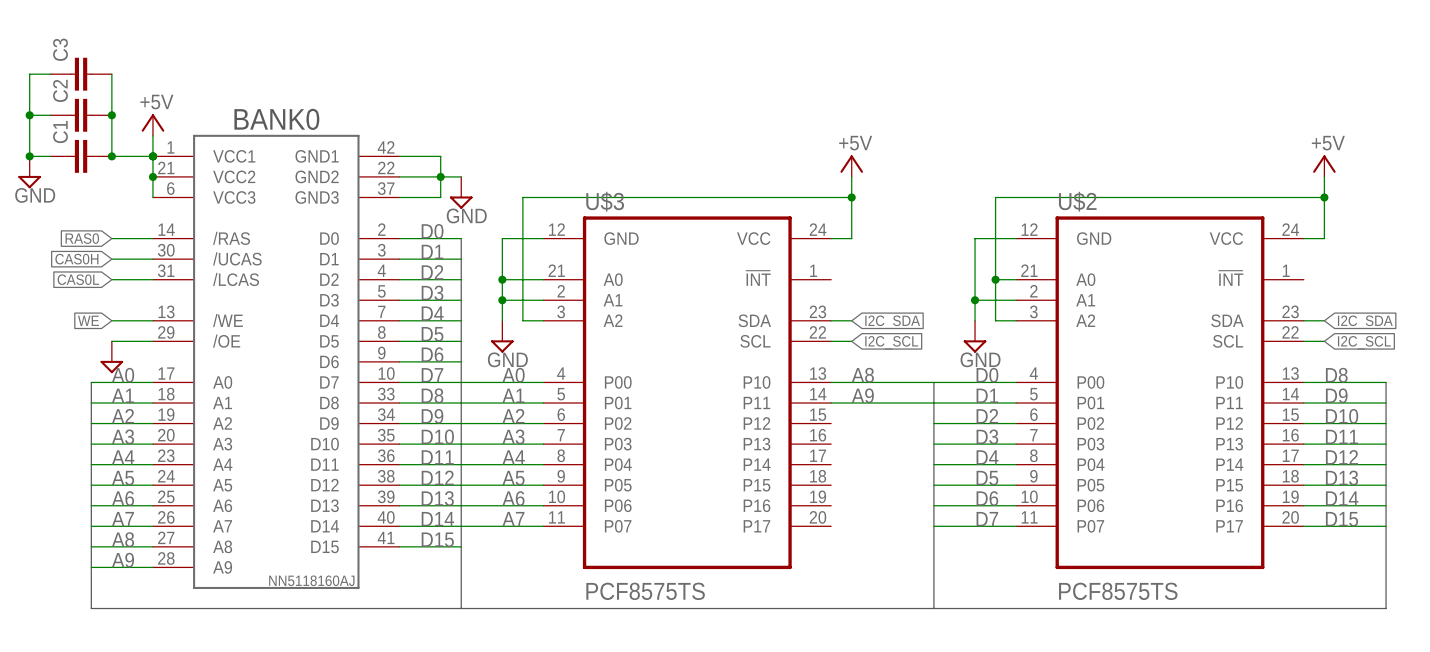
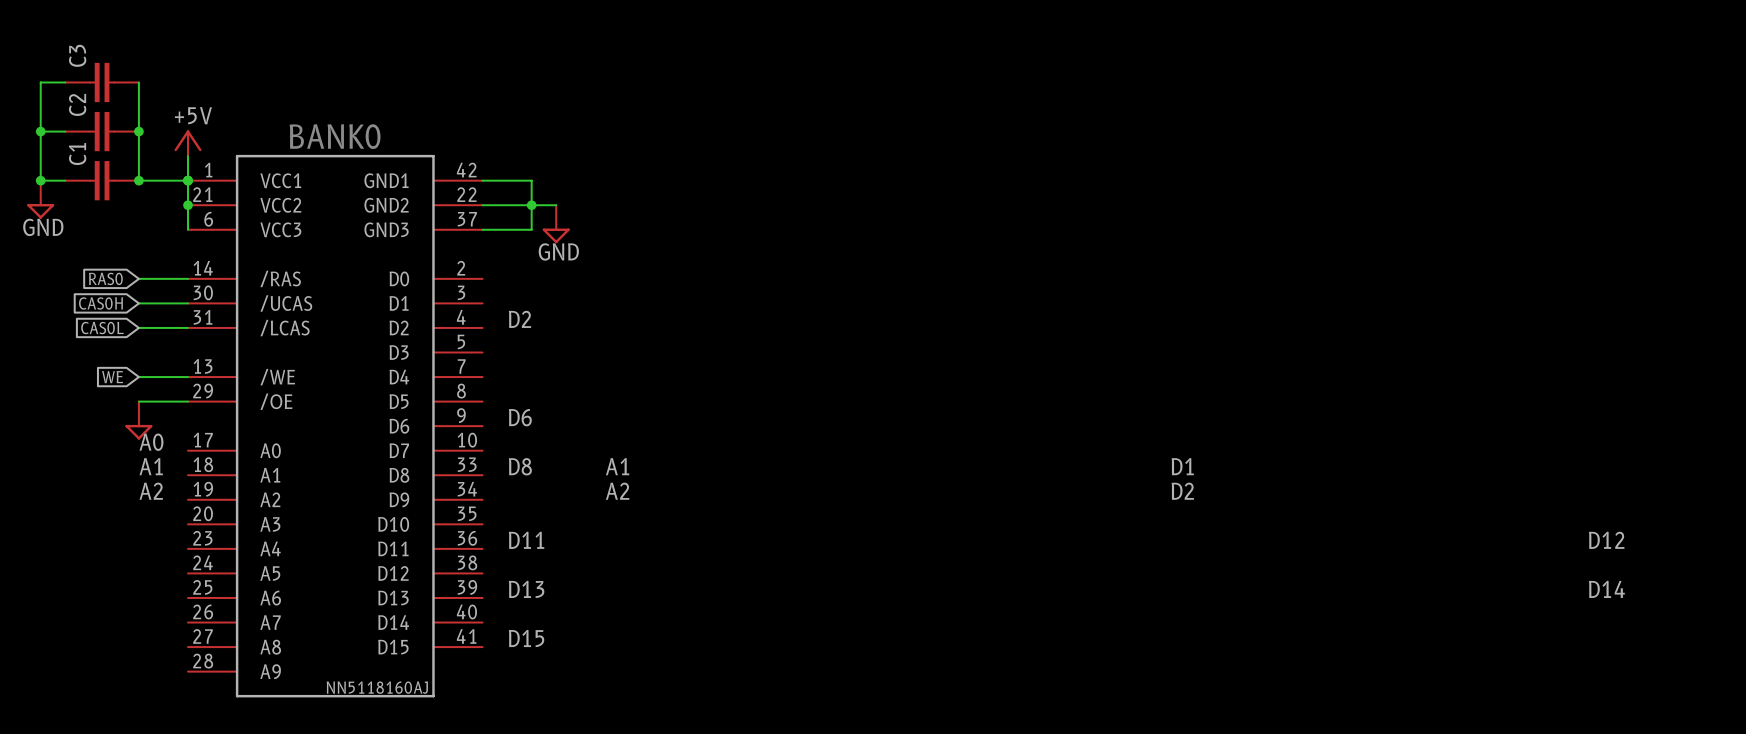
power symbol: +5V (851, 166) -> none
power symbol: +5V (1324, 166) -> none
wire: (851, 176) (851, 238) (831, 238) -> none
wire: (1324, 176) (1324, 238) (1303, 238) -> none
wire: (851, 197) (522, 197) (522, 320) (543, 320) -> none
junction: (851, 197) -> none
wire: (1324, 197) (995, 197) (995, 320) (1016, 320) -> none
junction: (1324, 197) -> none
label: D0 (432, 231) -> none
wire: (399, 238) (461, 238) -> none
bus: (461, 238) (461, 608) -> none
wire: (543, 238) (502, 238) (502, 320) -> none
wire: (1016, 238) (975, 238) (975, 320) -> none
label: D1 (432, 251) -> none
wire: (399, 259) (461, 259) -> none
wire: (399, 279) (461, 279) -> none
wire: (502, 279) (543, 279) -> none
junction: (502, 279) -> none
wire: (995, 279) (1016, 279) -> none
junction: (995, 279) -> none
label: D3 (432, 293) -> none
wire: (399, 300) (461, 300) -> none
wire: (502, 300) (543, 300) -> none
junction: (502, 300) -> none
wire: (975, 300) (1016, 300) -> none
junction: (975, 300) -> none
label: D4 (432, 313) -> none
wire: (399, 320) (461, 320) -> none
wire: (831, 320) (851, 320) -> none
wire: (1303, 320) (1324, 320) -> none
global label: I2C_SDA (892, 322) -> none
global label: I2C_SDA (1365, 322) -> none
label: D5 (432, 334) -> none
power symbol: GND (502, 336) -> none
power symbol: GND (975, 336) -> none
wire: (399, 341) (461, 341) -> none
wire: (831, 341) (851, 341) -> none
wire: (1303, 341) (1324, 341) -> none
global label: I2C_SCL (891, 342) -> none
global label: I2C_SCL (1364, 342) -> none
wire: (399, 361) (461, 361) -> none
label: D7 (432, 375) -> none
label: A0 (513, 375) -> none
label: A8 (862, 375) -> none
label: D0 (987, 375) -> none
label: D8 (1336, 375) -> none
bus: (91, 382) (91, 608) (1386, 608) (1386, 382) -> none
wire: (91, 382) (152, 382) -> none
wire: (399, 382) (543, 382) -> none
wire: (831, 382) (1016, 382) -> none
bus: (933, 382) (933, 608) -> none
wire: (1303, 382) (1386, 382) -> none
U$3: PCF8575TS (687, 392) -> none
U$2: PCF8575TS (1159, 392) -> none
label: A9 (862, 395) -> none
label: D9 (1336, 395) -> none
wire: (91, 403) (152, 403) -> none
wire: (399, 403) (543, 403) -> none
wire: (831, 403) (1016, 403) -> none
wire: (1303, 403) (1386, 403) -> none
label: D9 (432, 416) -> none
label: D10 (1342, 416) -> none
wire: (91, 423) (152, 423) -> none
wire: (399, 423) (543, 423) -> none
wire: (933, 423) (1016, 423) -> none
wire: (1303, 423) (1386, 423) -> none
label: A3 (122, 436) -> none
label: D10 (437, 436) -> none
label: A3 (513, 436) -> none
label: D3 (987, 436) -> none
label: D11 (1341, 436) -> none
wire: (91, 444) (152, 444) -> none
wire: (399, 444) (543, 444) -> none
wire: (933, 444) (1016, 444) -> none
wire: (1303, 444) (1386, 444) -> none
label: A4 (123, 457) -> none
label: A4 (513, 457) -> none
label: D4 (987, 457) -> none
wire: (91, 464) (152, 464) -> none
wire: (399, 464) (543, 464) -> none
wire: (933, 464) (1016, 464) -> none
wire: (1303, 464) (1386, 464) -> none
label: D12 (437, 477) -> none
label: A5 (123, 478) -> none
label: A5 (513, 478) -> none
label: D5 (987, 478) -> none
label: D13 (1342, 478) -> none
wire: (91, 485) (152, 485) -> none
wire: (399, 485) (543, 485) -> none
wire: (933, 485) (1016, 485) -> none
wire: (1303, 485) (1386, 485) -> none
label: A6 (122, 498) -> none
label: A6 (513, 498) -> none
label: D6 (987, 498) -> none
wire: (91, 505) (152, 505) -> none
wire: (399, 505) (543, 505) -> none
wire: (933, 505) (1016, 505) -> none
wire: (1303, 505) (1386, 505) -> none
label: A7 (122, 519) -> none
label: D14 (437, 519) -> none
label: A7 (513, 519) -> none
label: D7 (987, 519) -> none
label: D15 (1342, 519) -> none
wire: (91, 526) (152, 526) -> none
wire: (399, 526) (543, 526) -> none
wire: (933, 526) (1016, 526) -> none
wire: (1303, 526) (1386, 526) -> none
label: A8 (122, 539) -> none
wire: (91, 546) (152, 546) -> none
wire: (399, 546) (461, 546) -> none
label: A9 (122, 560) -> none
wire: (91, 567) (152, 567) -> none

